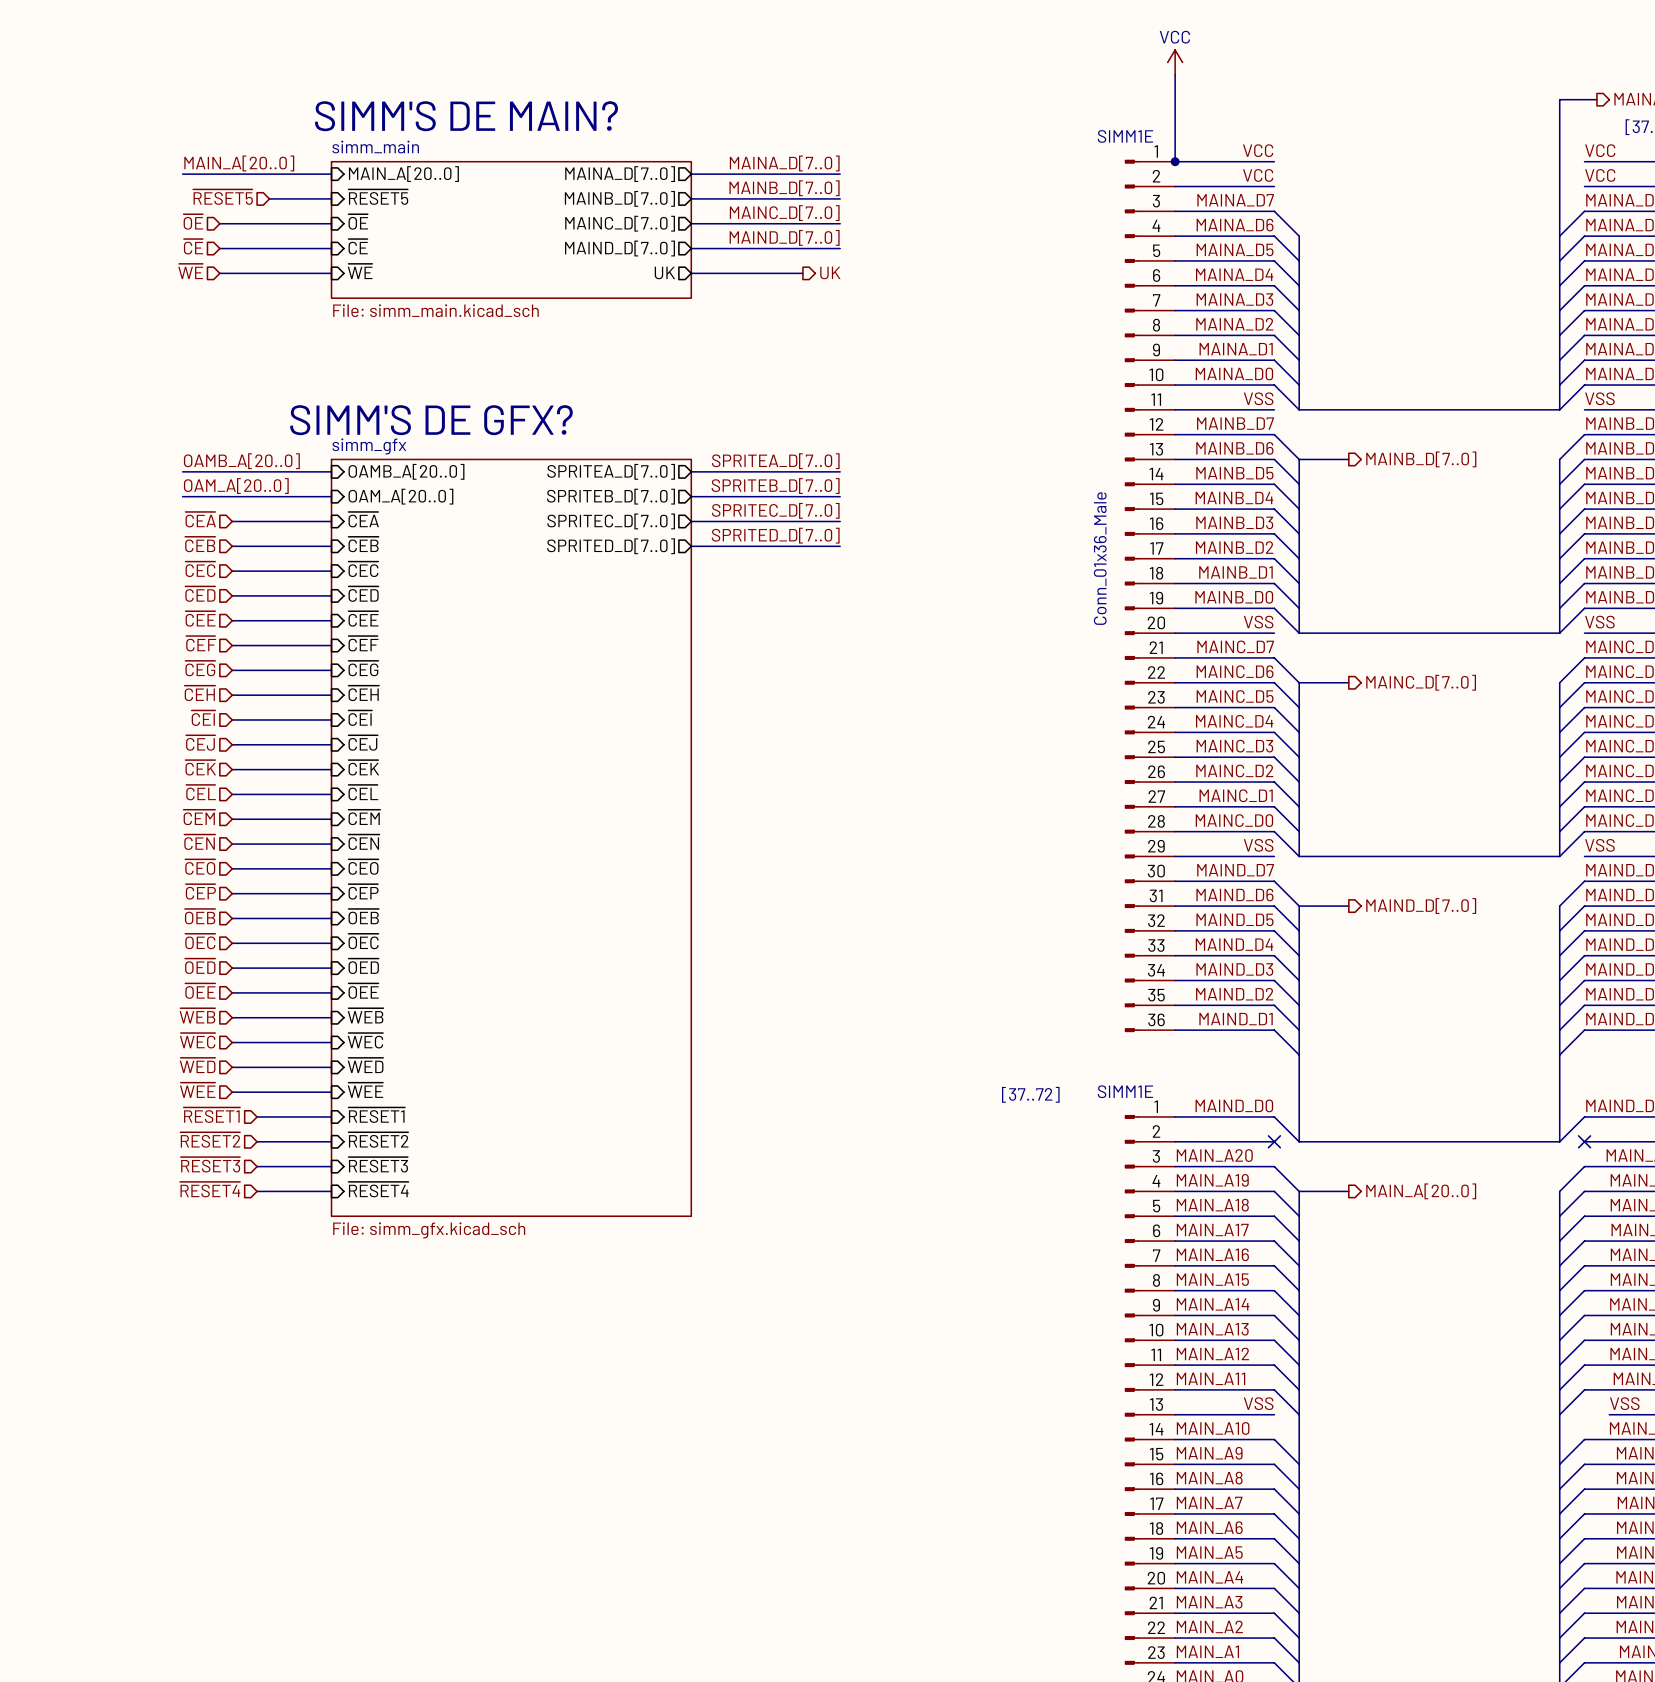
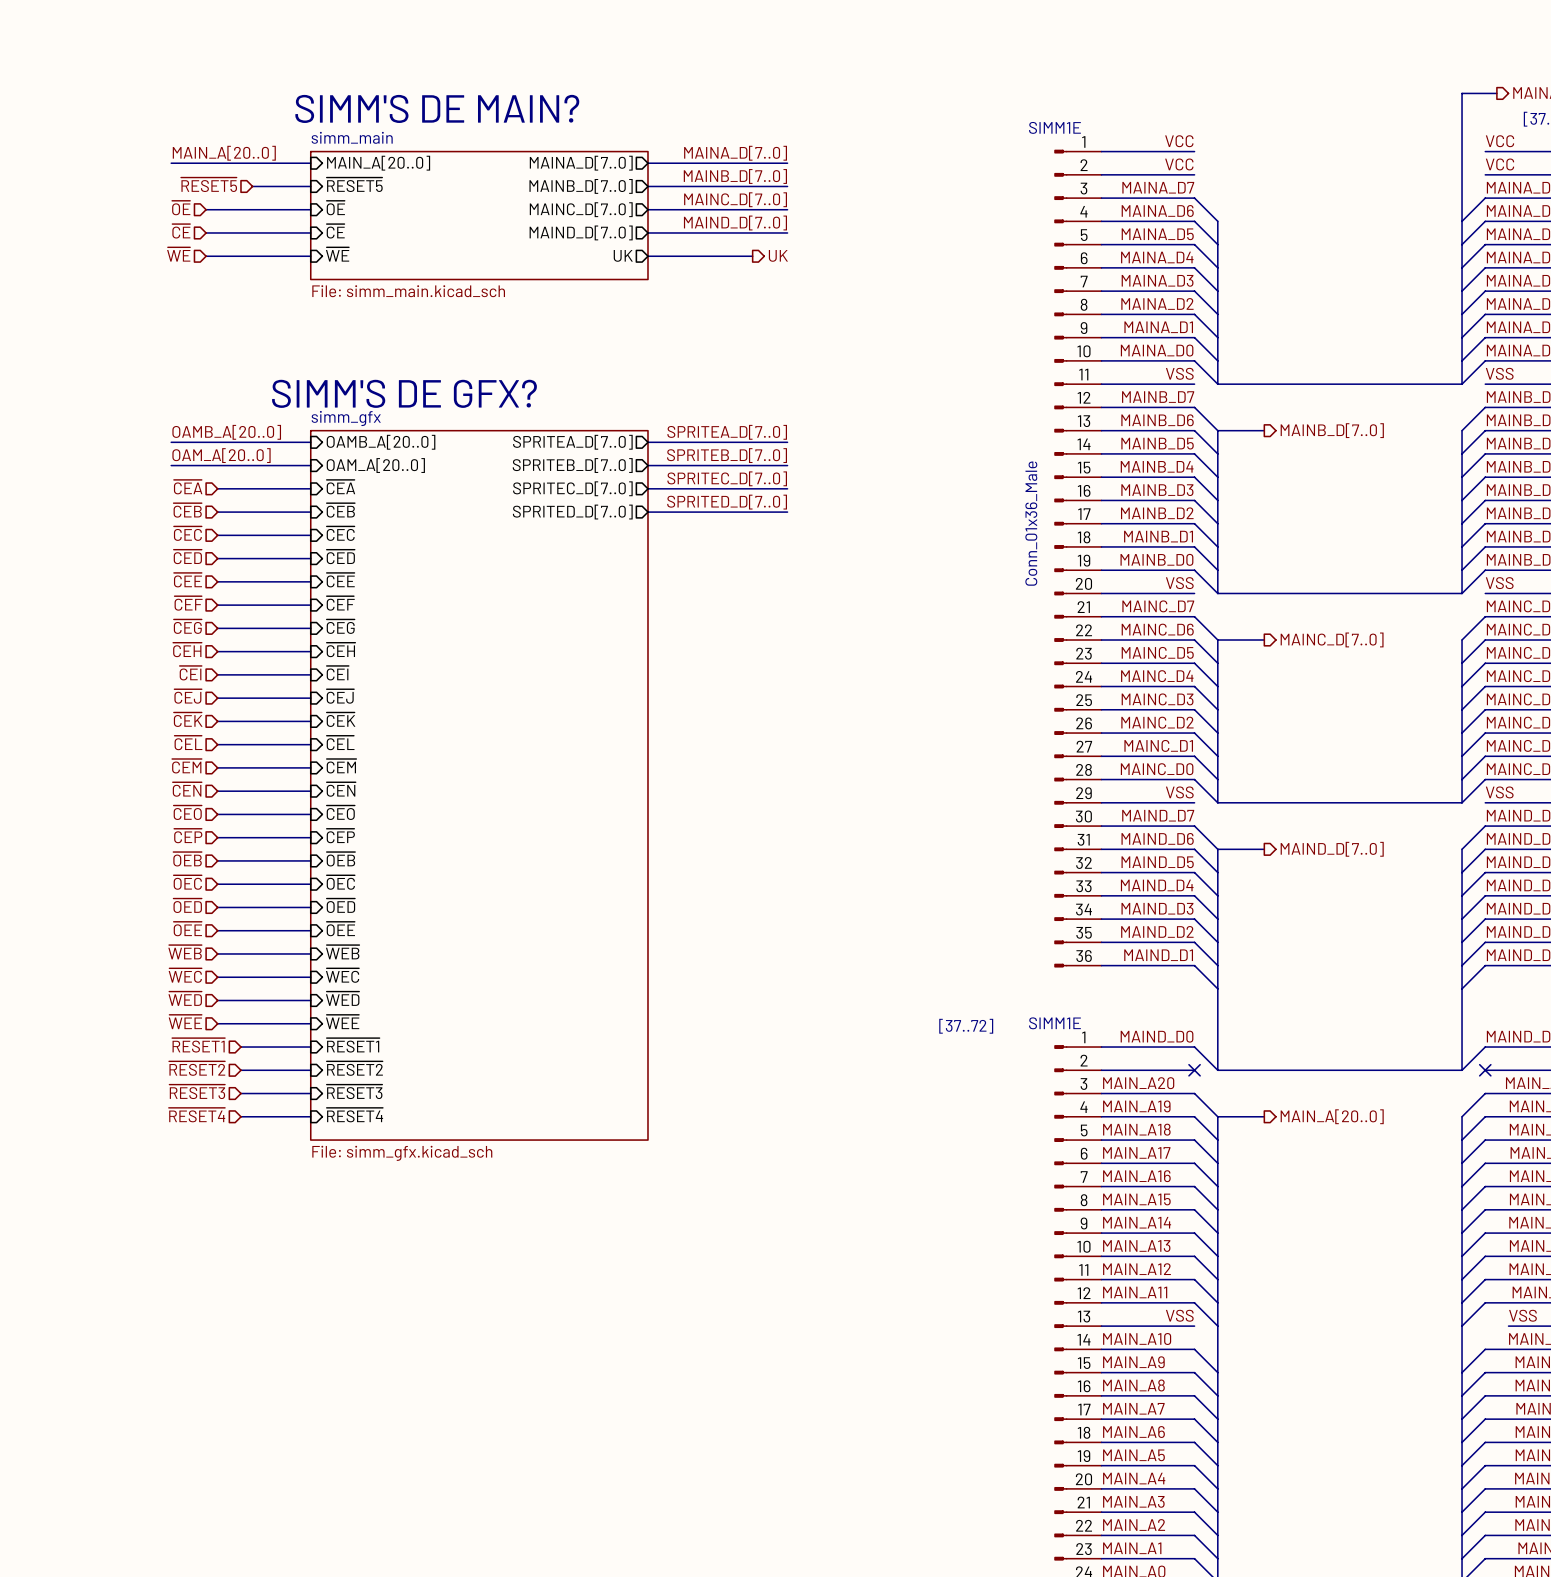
power symbol: VCC (1175, 62) -> none
wire: (1175, 74) (1175, 161) -> none
junction: (1175, 161) -> none

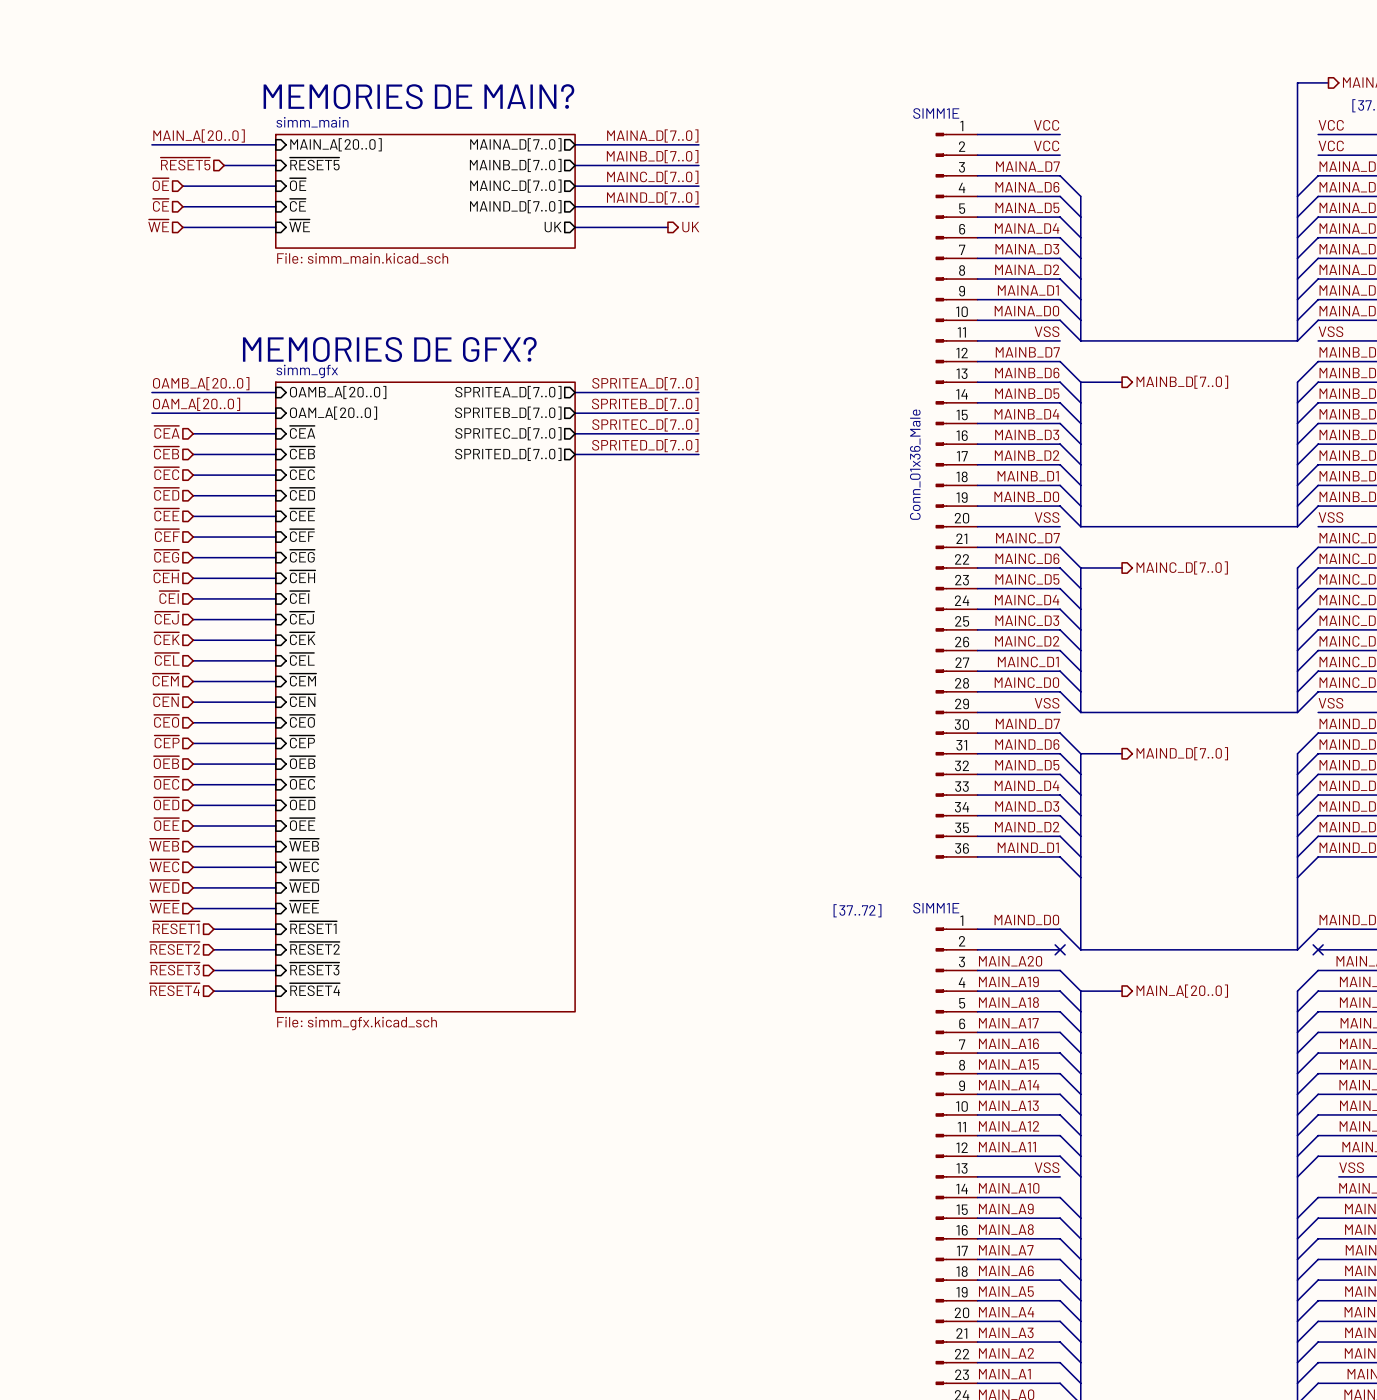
text: SIMM'S DE MAIN? (437, 108) -> MEMORIES DE MAIN? (418, 96)
text: SIMM'S DE GFX? (404, 393) -> MEMORIES DE GFX? (389, 349)

